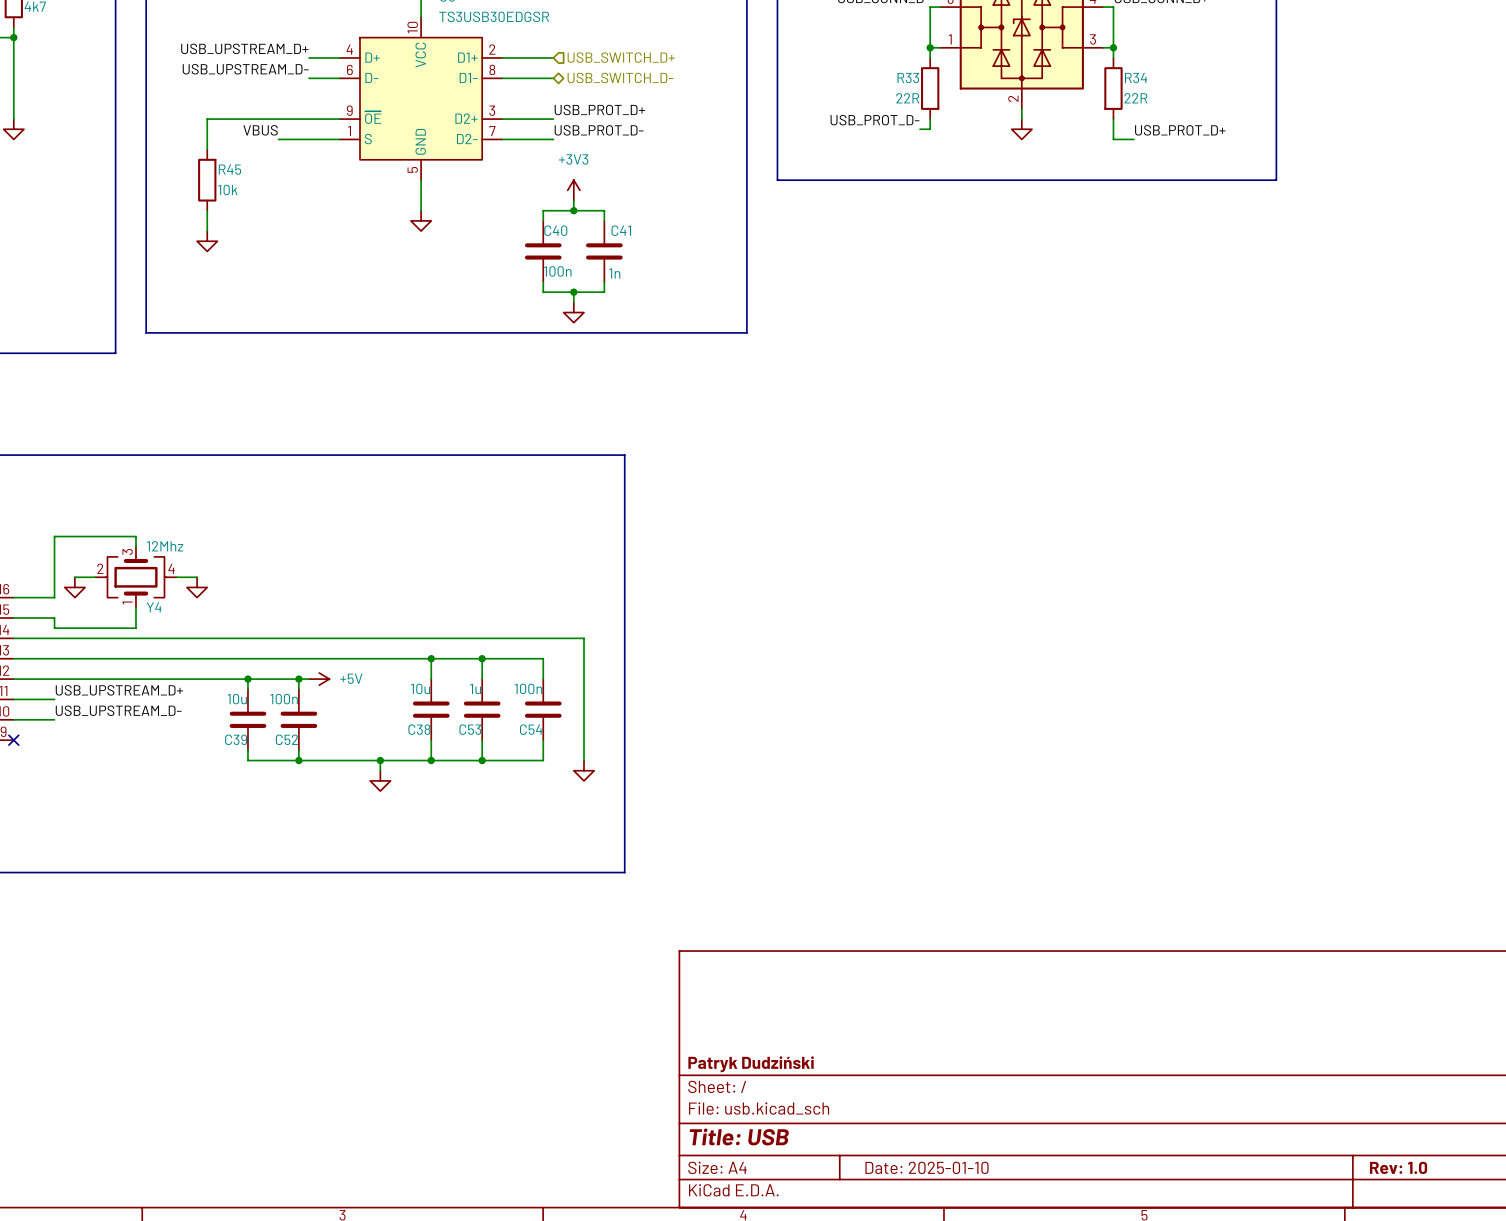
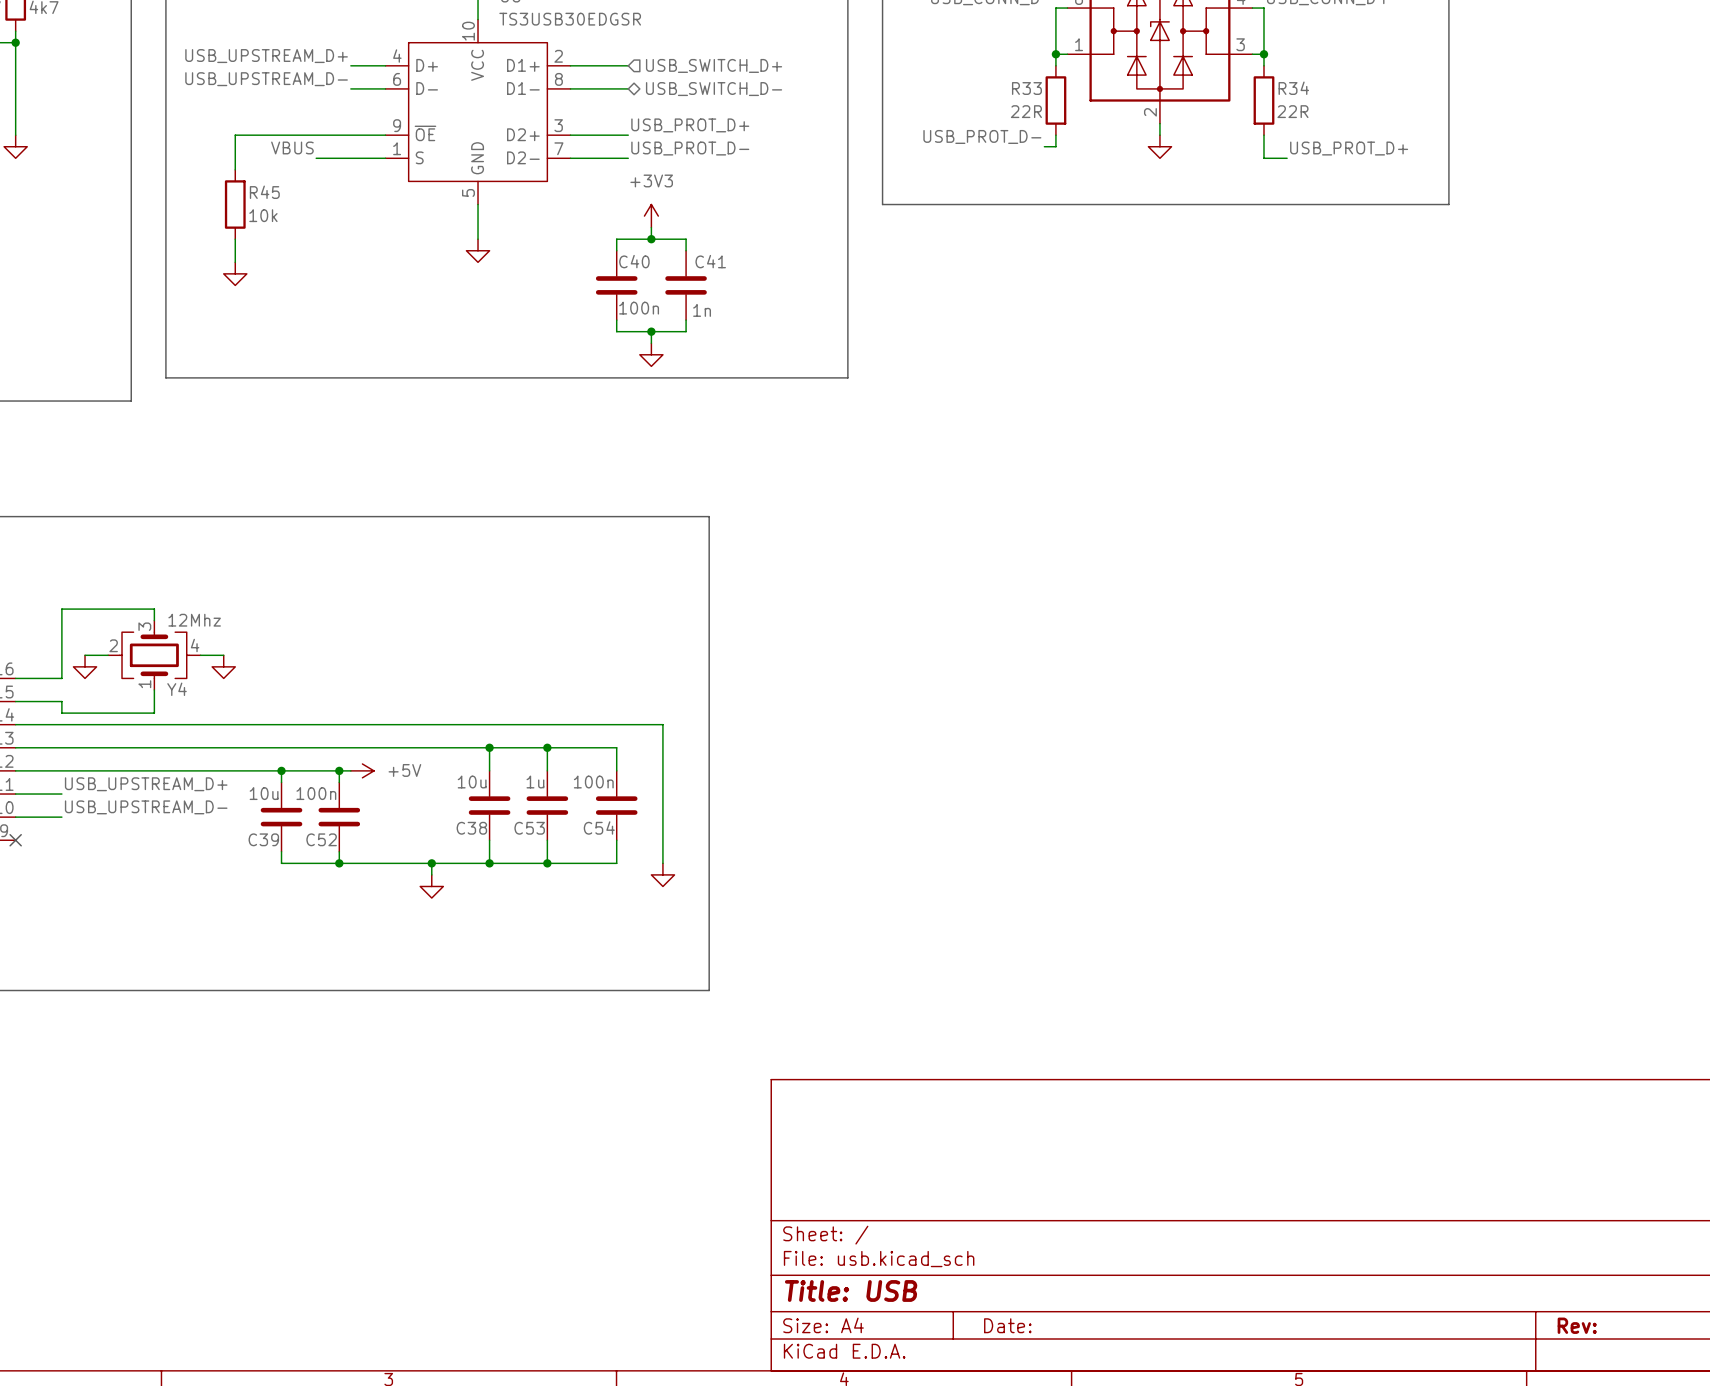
title block: Patryk Dudziński (751, 1064) -> none
title block: Date: 2025-01-10 (927, 1167) -> Date: (1007, 1325)
title block: Rev: 1.0 (1398, 1167) -> Rev: (1577, 1325)

